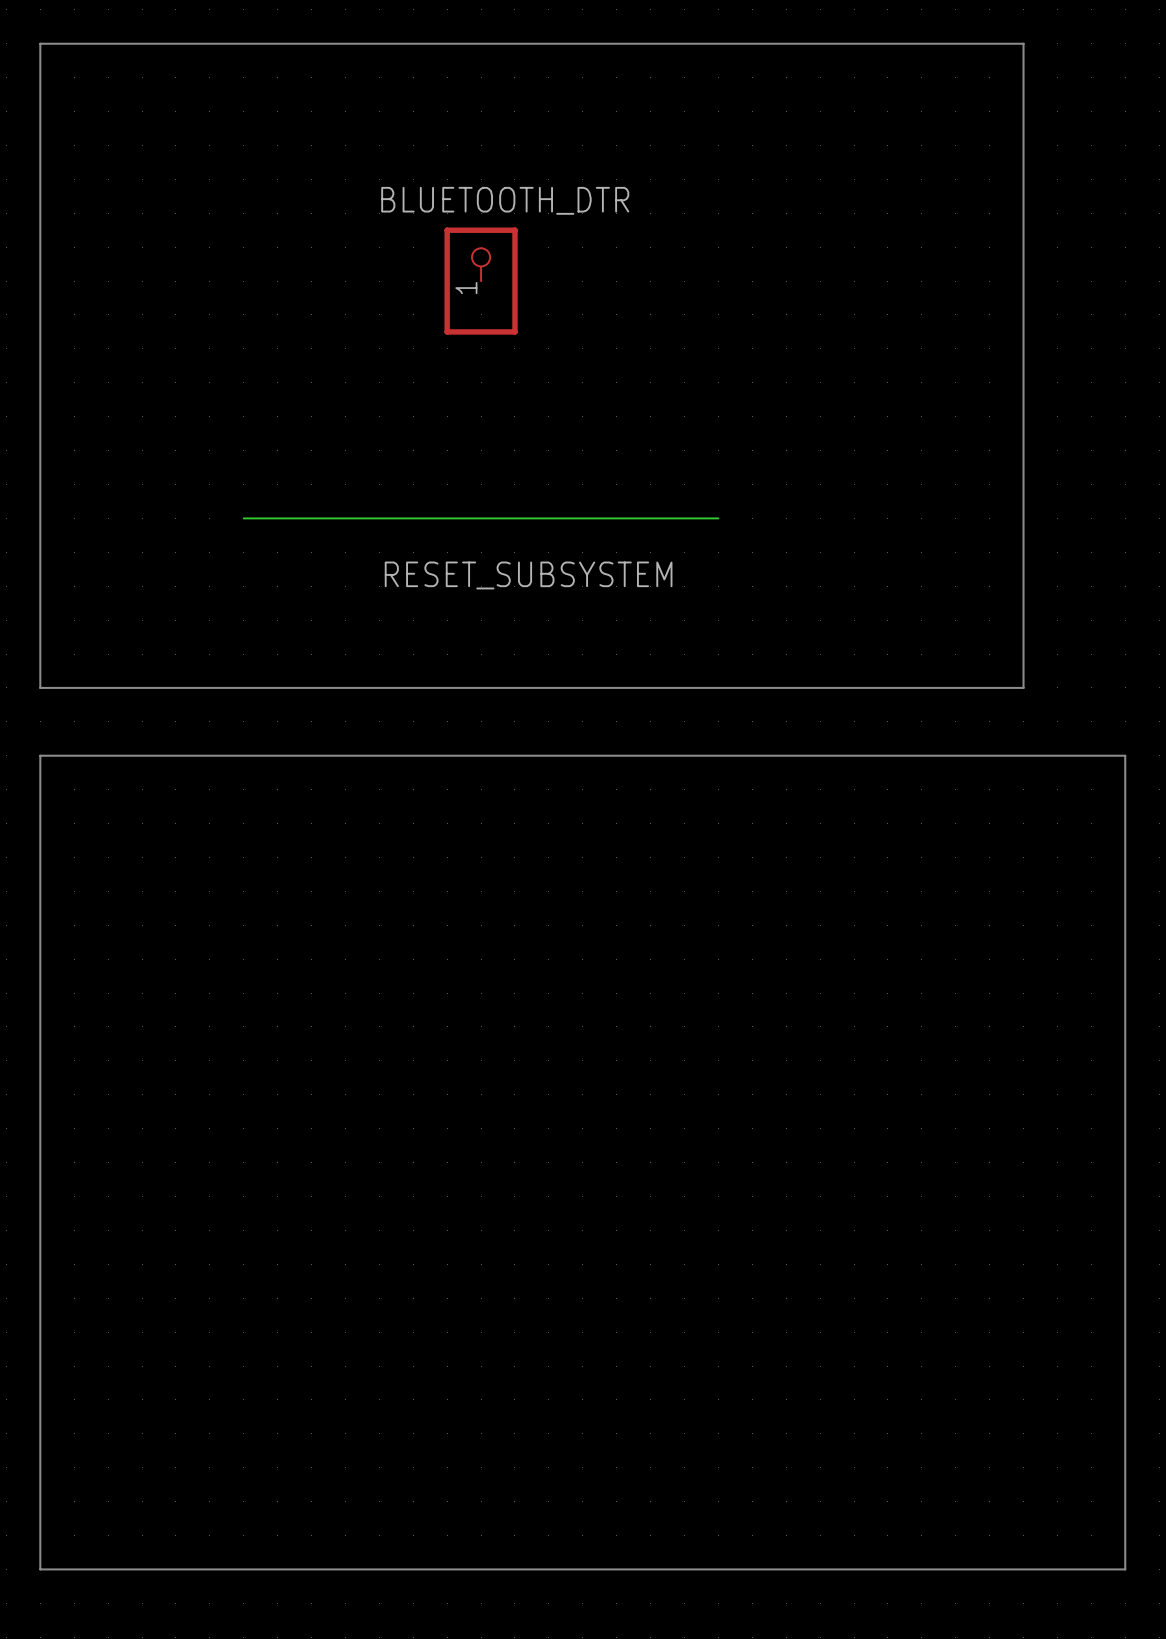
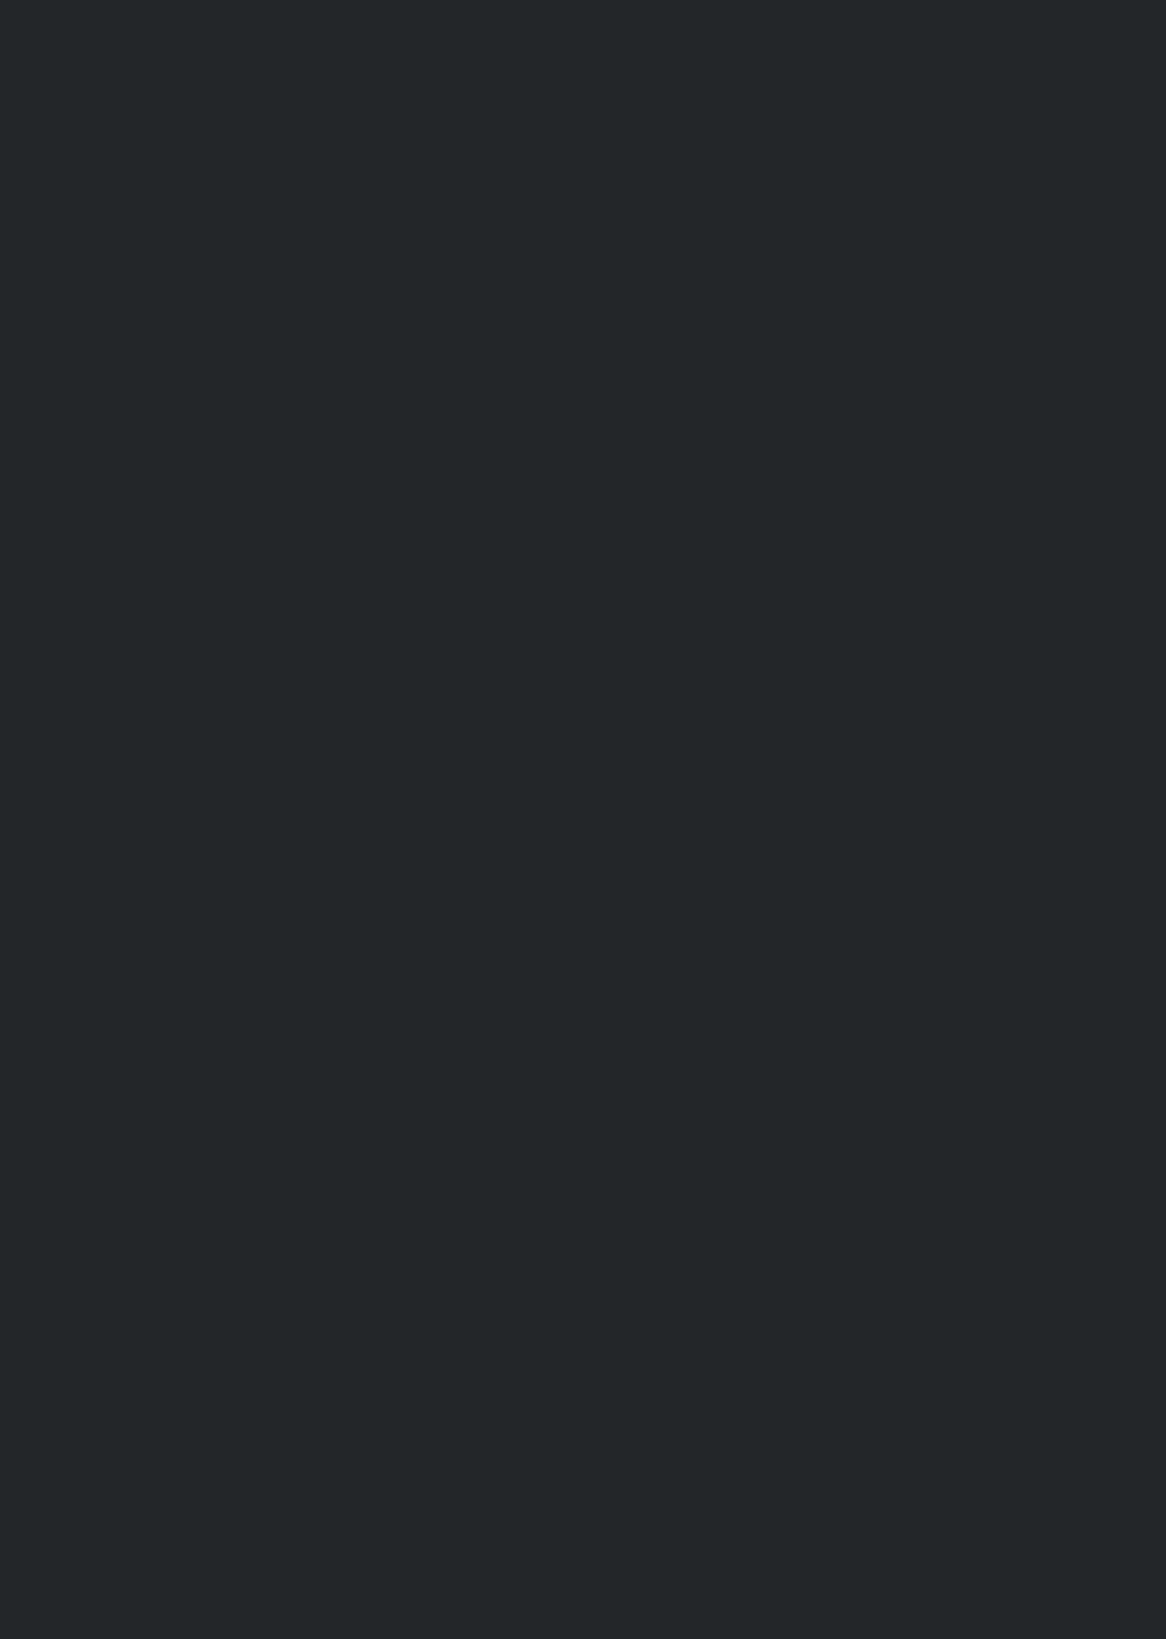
line: (40, 43) (40, 687) (1023, 687) (1023, 43) (40, 43) -> none
BLUETOOTH_DTR: (481, 281) -> none
wire: (243, 518) (718, 518) -> none
label: RESET_SUBSYSTEM (528, 575) -> none
line: (40, 755) (40, 1569) (1125, 1569) (1125, 755) (40, 755) -> none

